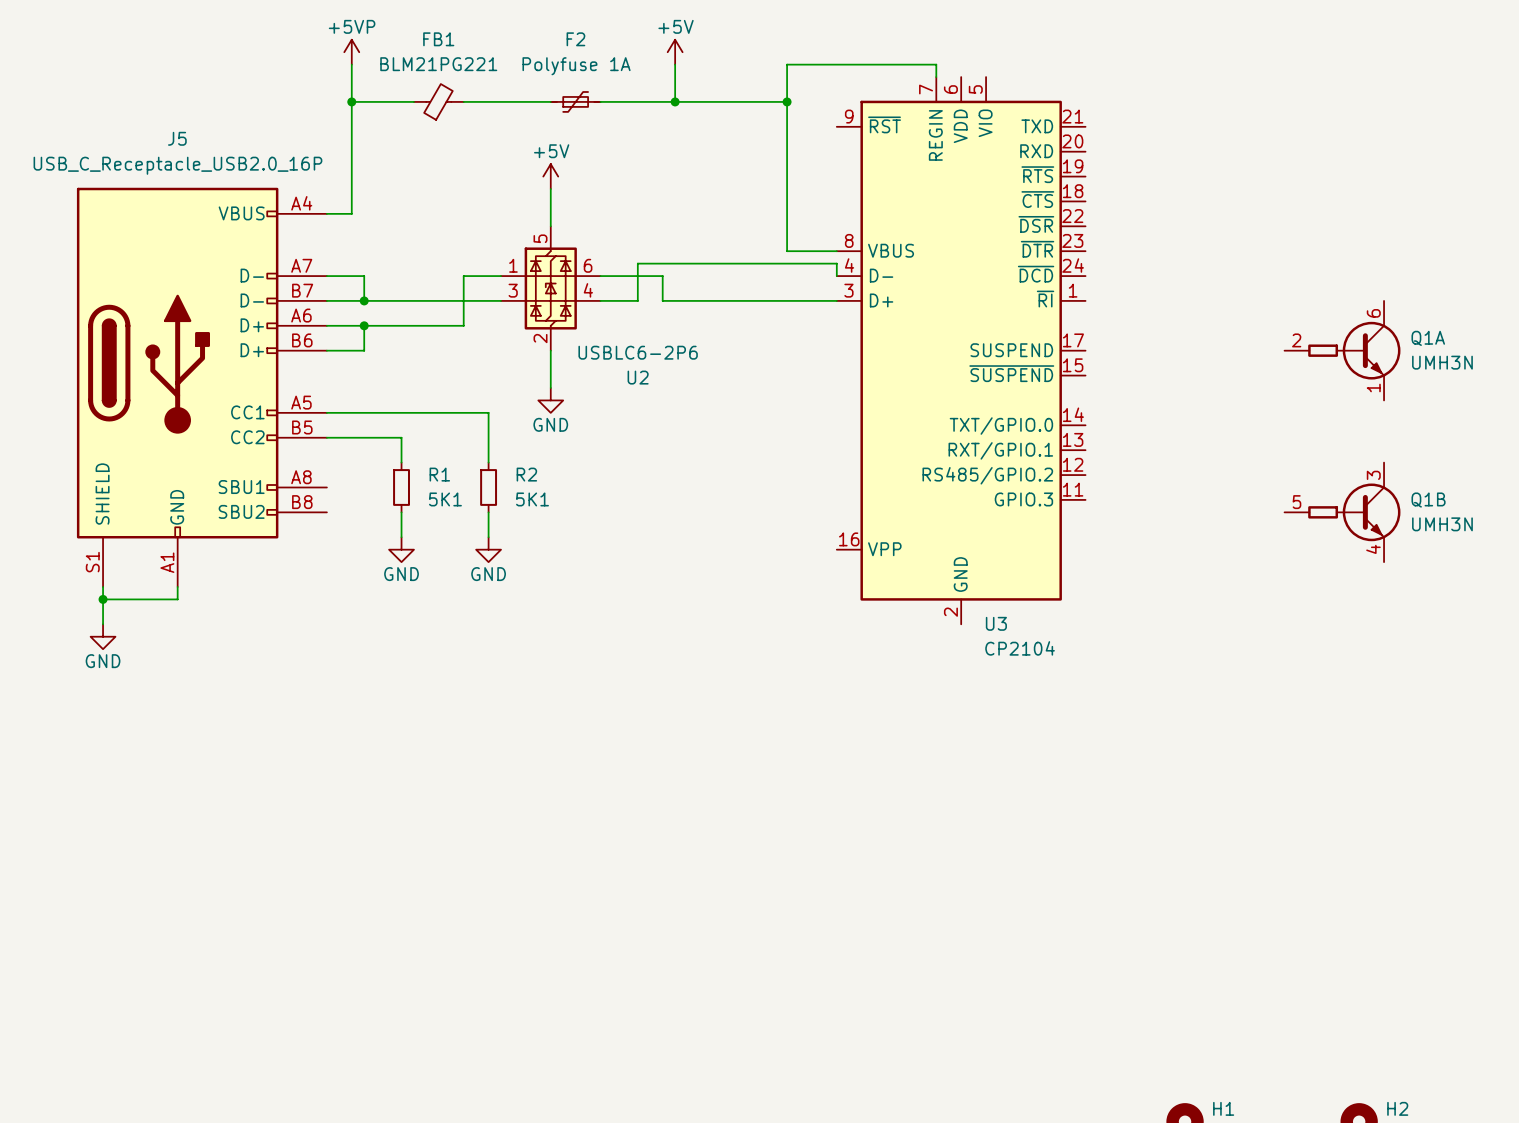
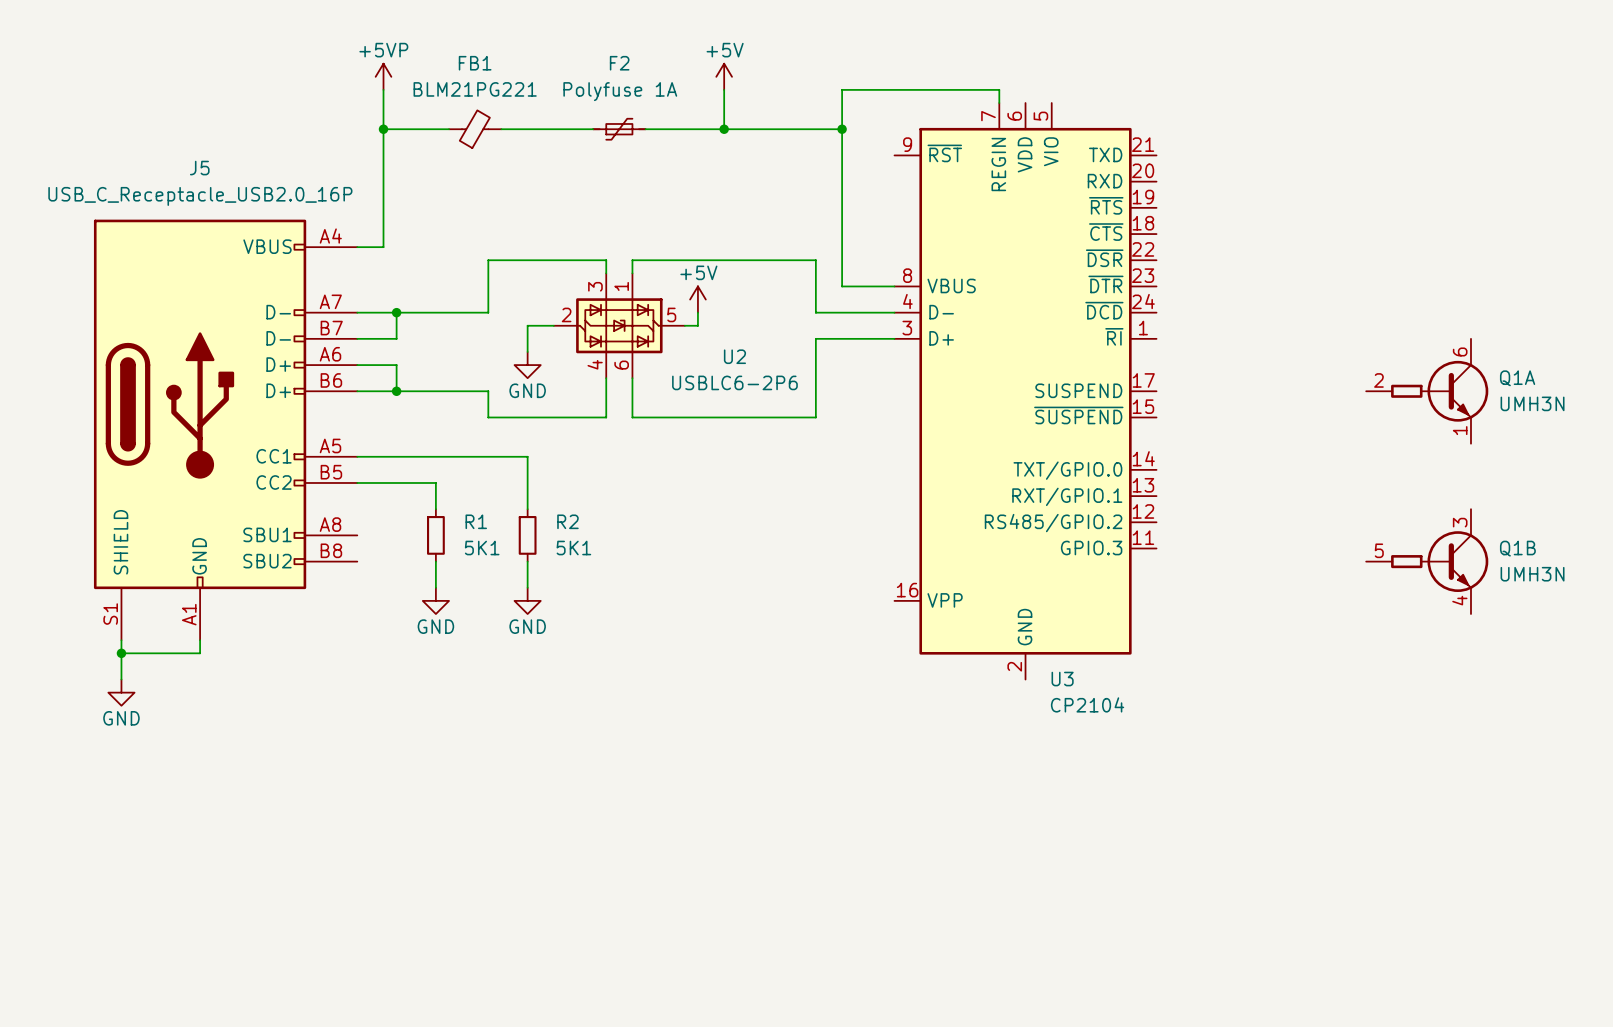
power symbol position: +5V (550, 176) -> +5V (697, 299)
wire: (550, 189) (550, 226) -> none
wire: none -> (606, 273) (606, 260) (488, 260) (488, 312) (396, 312)
junction: none -> (396, 312)
wire: (501, 276) (463, 276) (463, 325) (364, 325) -> none
wire: (600, 276) (662, 276) (662, 300) (762, 300) -> (632, 378) (632, 417) (815, 417) (815, 338)
wire: none -> (697, 312) (697, 325) (684, 325)
wire: (836, 276) (836, 263) (637, 263) (637, 300) (600, 300) -> (894, 312) (815, 312) (815, 260) (632, 260) (632, 273)
wire: none -> (553, 325) (527, 325) (527, 351)
U2 rotation: 0° (550, 288) -> 90° clockwise (619, 325)
wire: (364, 300) (501, 300) -> none
junction: (364, 300) -> none
junction: (364, 325) -> none
wire: none -> (606, 378) (606, 417) (488, 417) (488, 391) (396, 391)
junction: none -> (396, 391)
wire: (550, 350) (550, 387) -> none
U2 value position: USBLC6-2P6 (638, 352) -> USBLC6-2P6 (734, 382)
U2 name position: U2 (638, 377) -> U2 (734, 356)
power symbol position: GND (550, 400) -> GND (527, 365)

